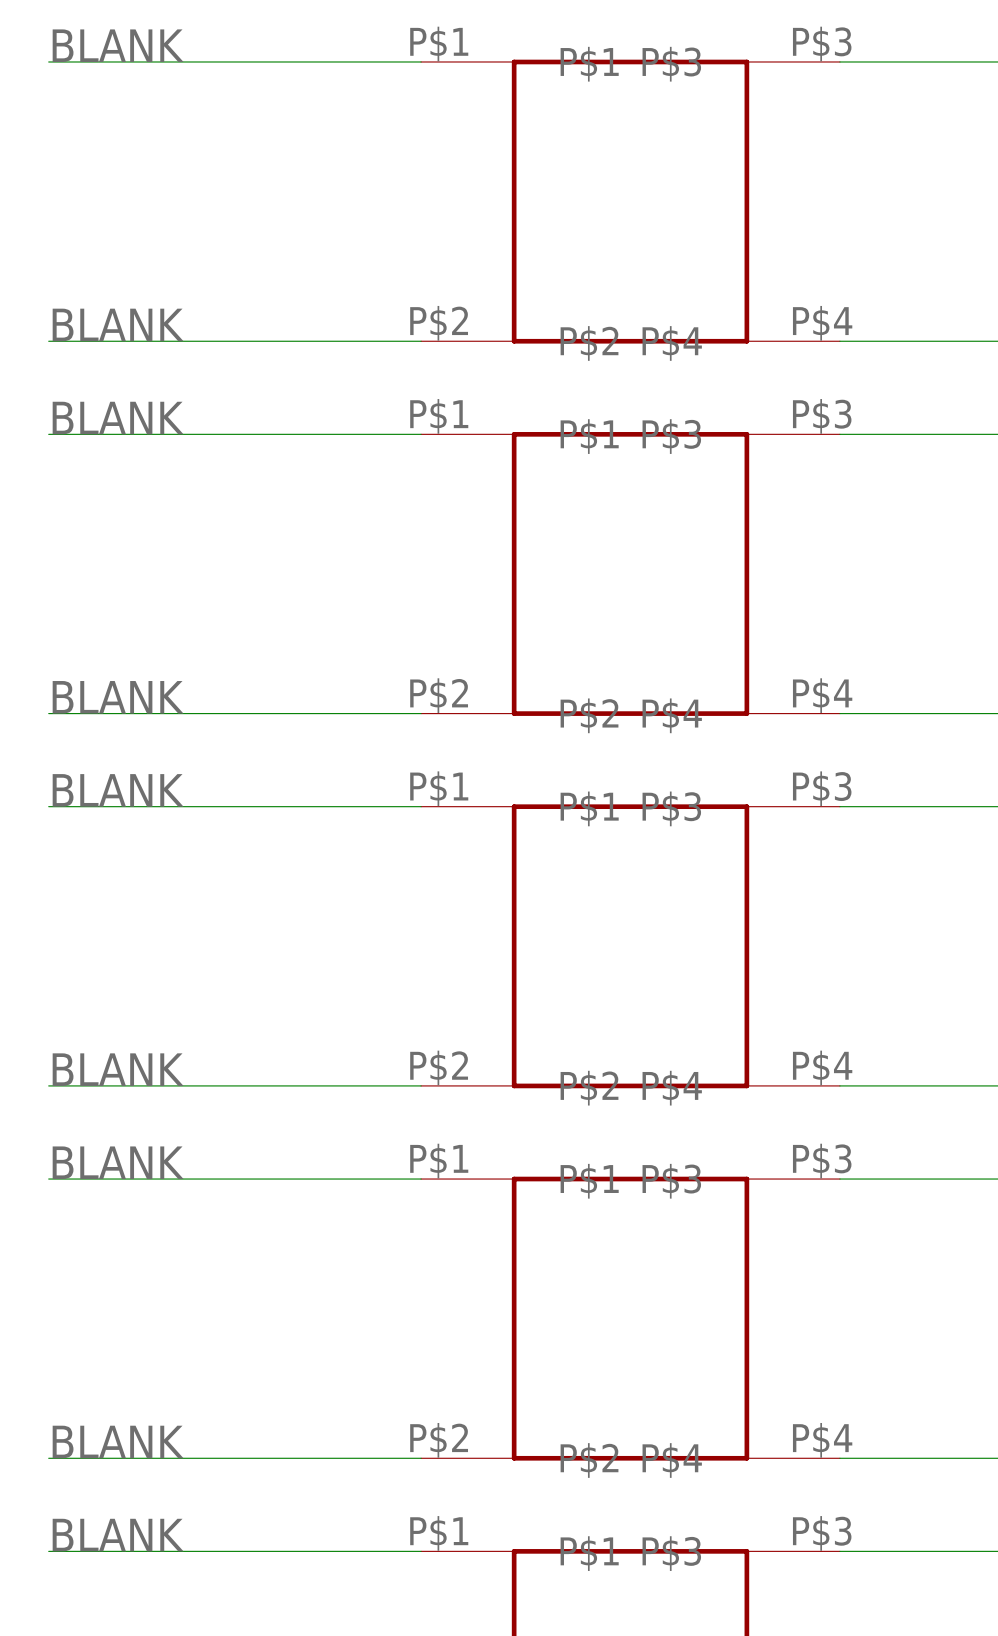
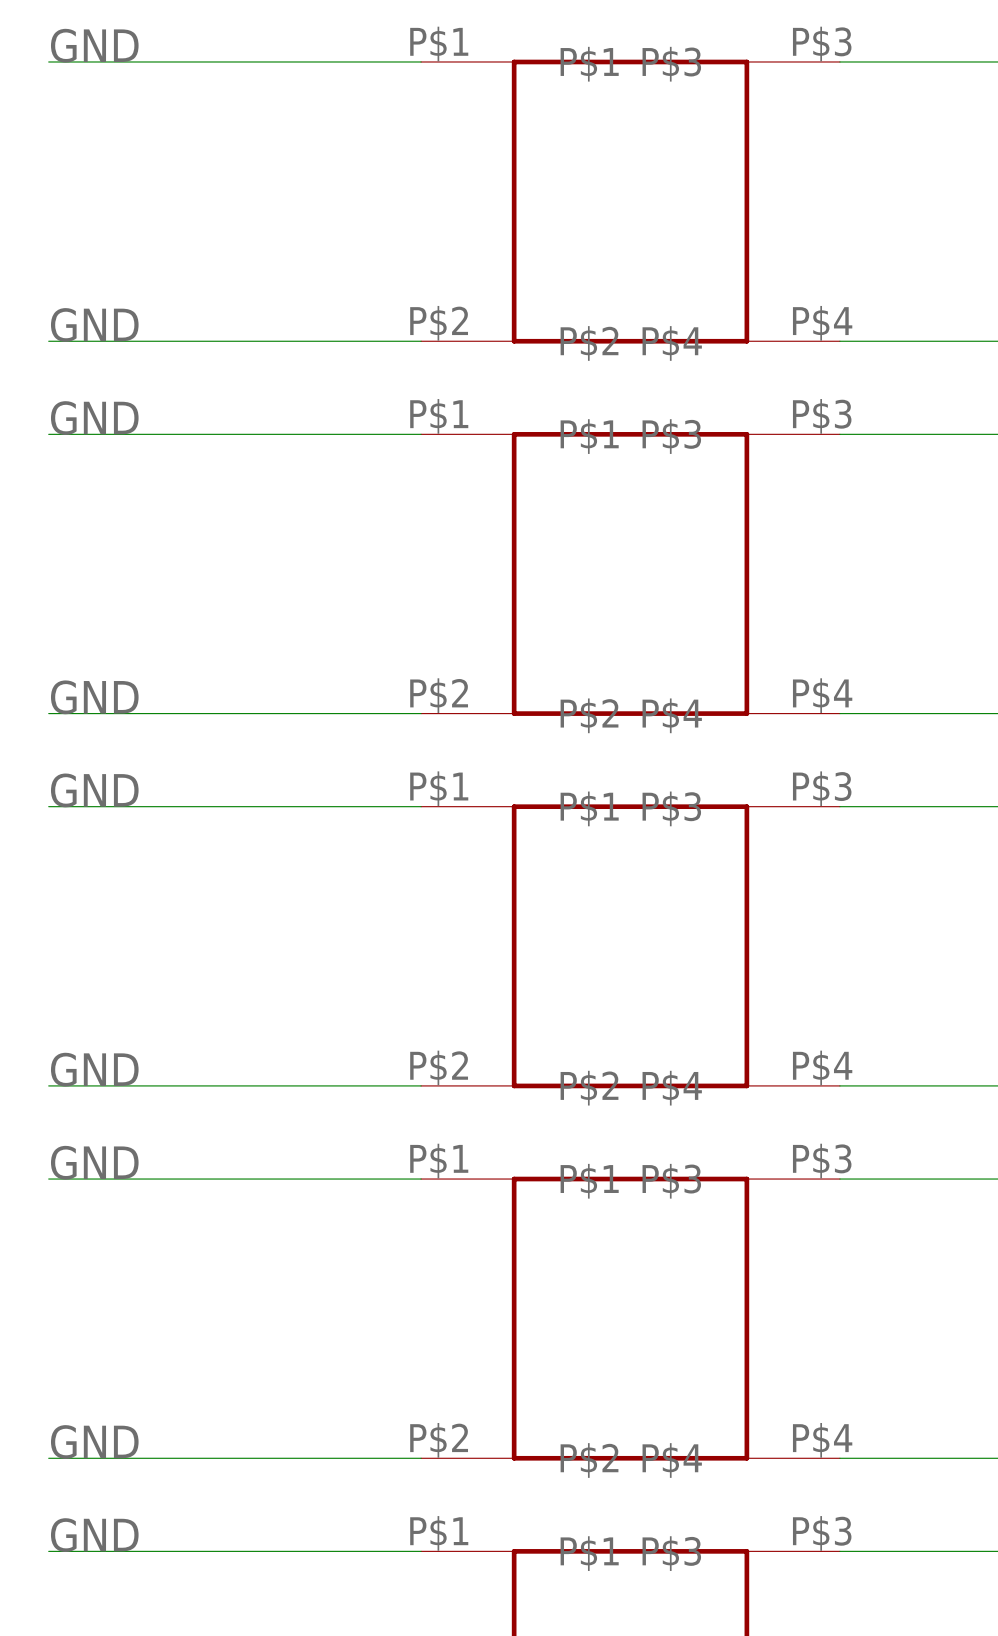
label: BLANK (118, 45) -> GND (94, 45)
label: BLANK (118, 324) -> GND (94, 324)
label: BLANK (118, 418) -> GND (94, 418)
label: BLANK (118, 697) -> GND (94, 697)
label: BLANK (118, 790) -> GND (94, 790)
label: BLANK (118, 1069) -> GND (94, 1069)
label: BLANK (118, 1162) -> GND (94, 1162)
label: BLANK (118, 1441) -> GND (94, 1442)
label: BLANK (118, 1535) -> GND (94, 1535)

